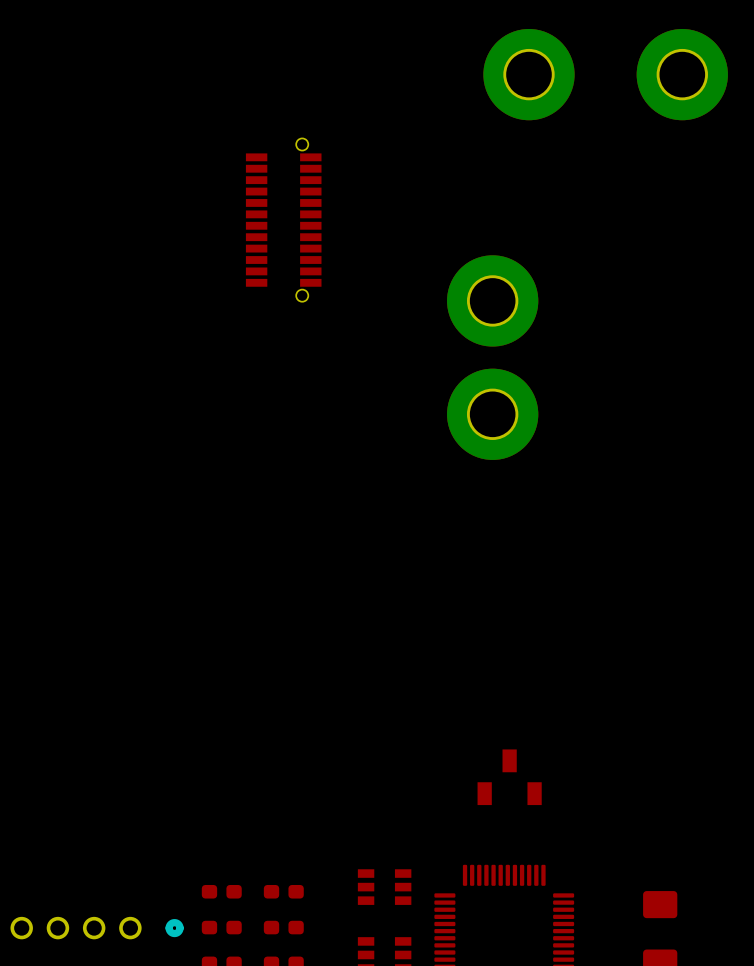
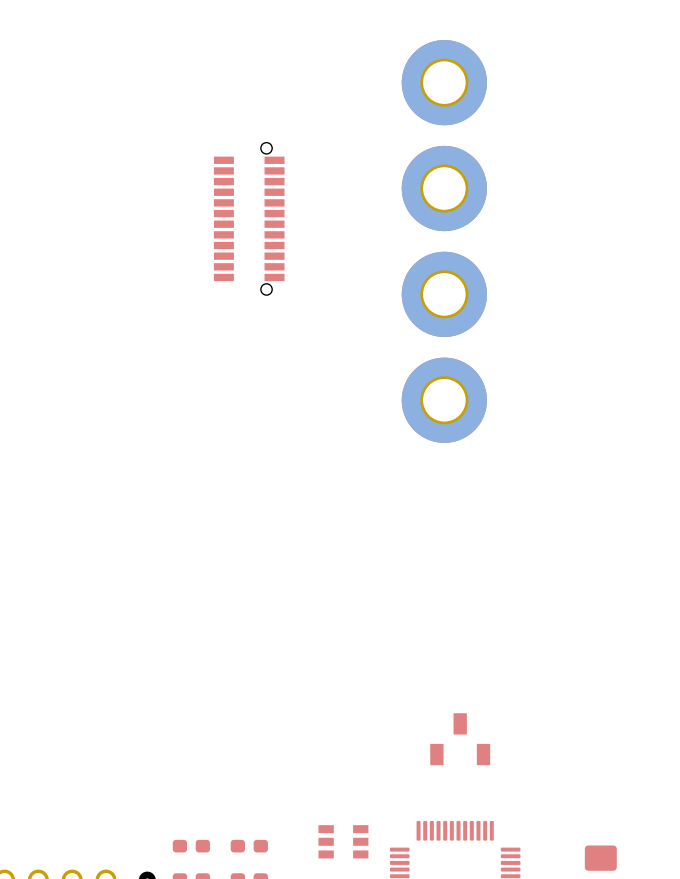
part position: (528, 74) -> (444, 82)
part: (682, 74) -> none
part: none -> (444, 188)

